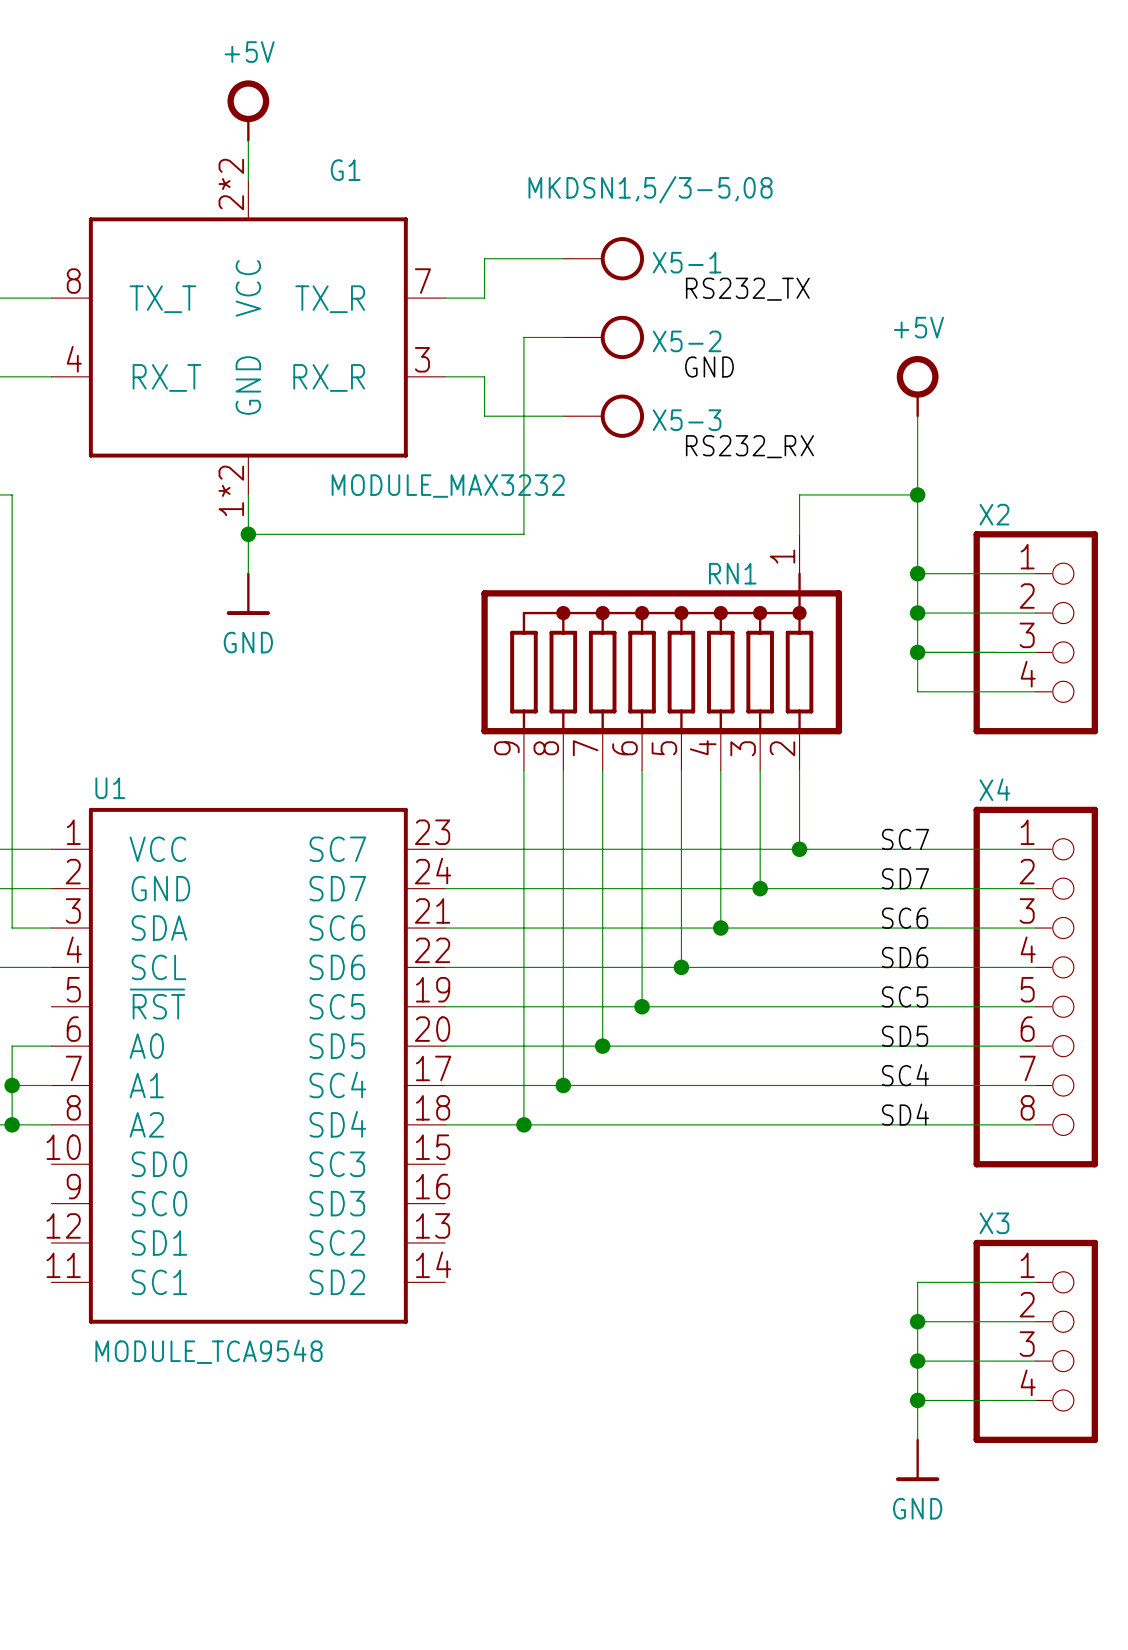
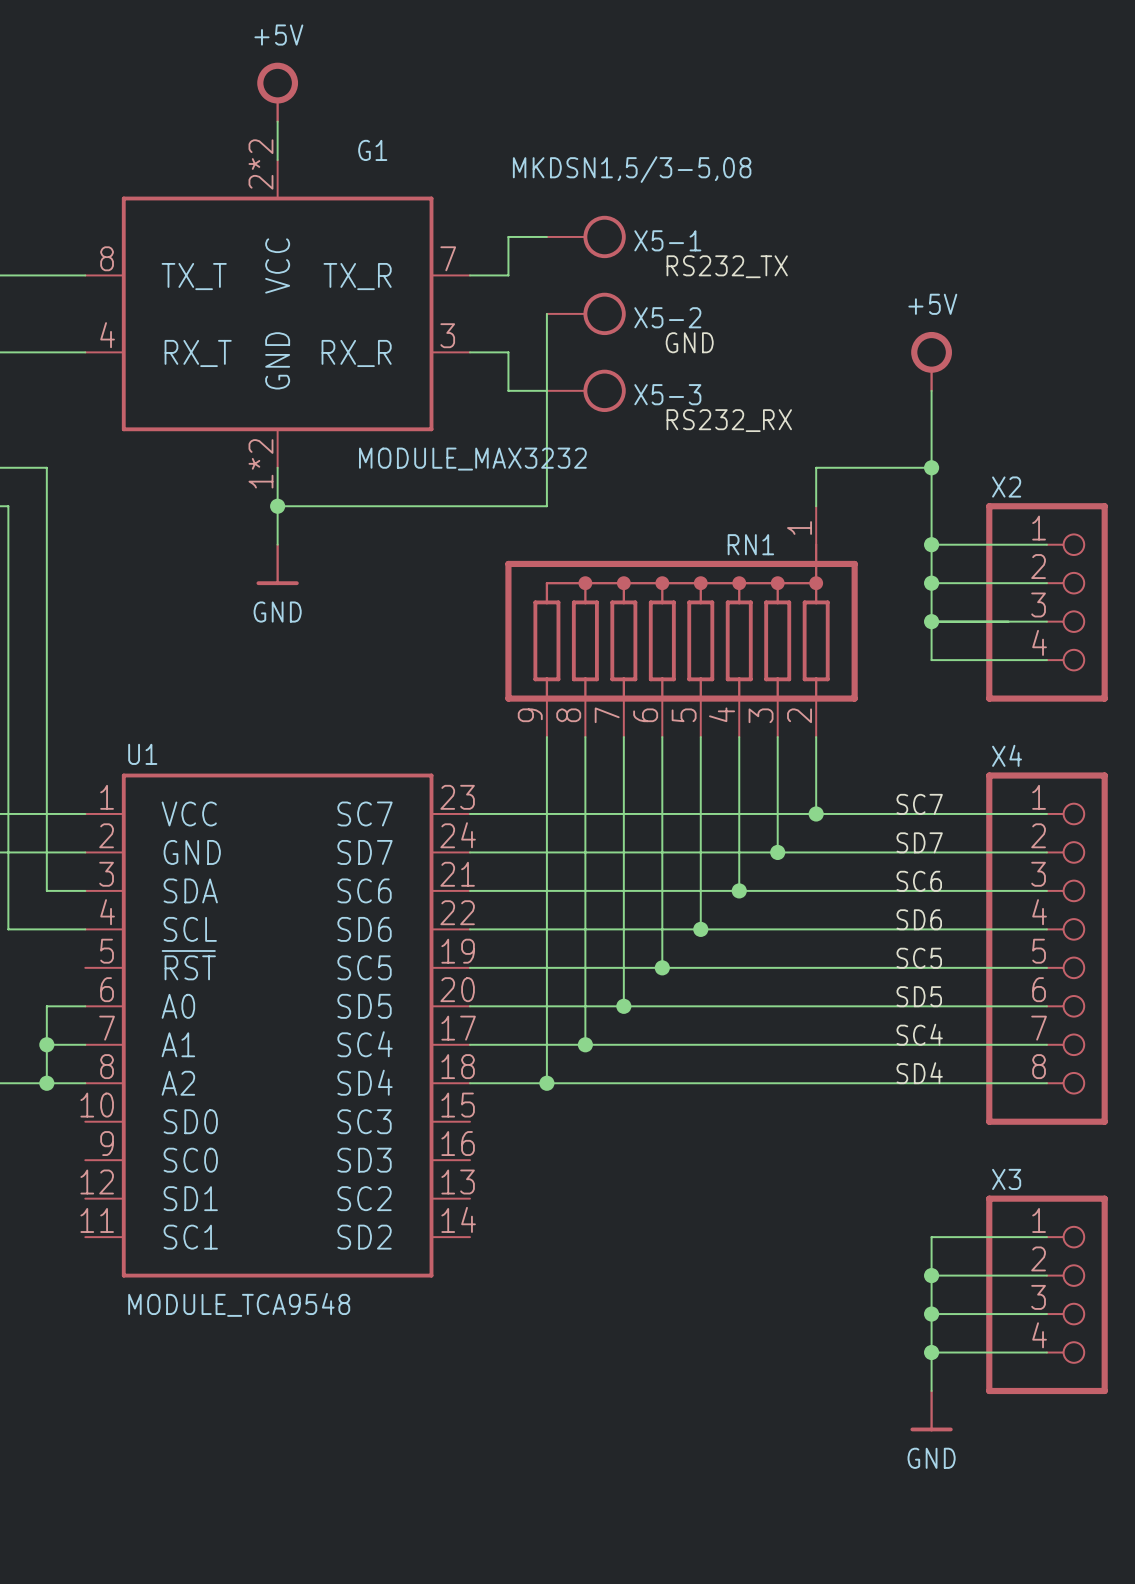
X5-1 position: (603, 258) -> (586, 236)
label position: RS232_TX (747, 289) -> RS232_TX (727, 266)
X5-2 position: (603, 337) -> (586, 313)
label position: GND (709, 366) -> GND (689, 342)
X5-3 position: (603, 416) -> (586, 390)
label position: RS232_RX (749, 446) -> RS232_RX (729, 420)

